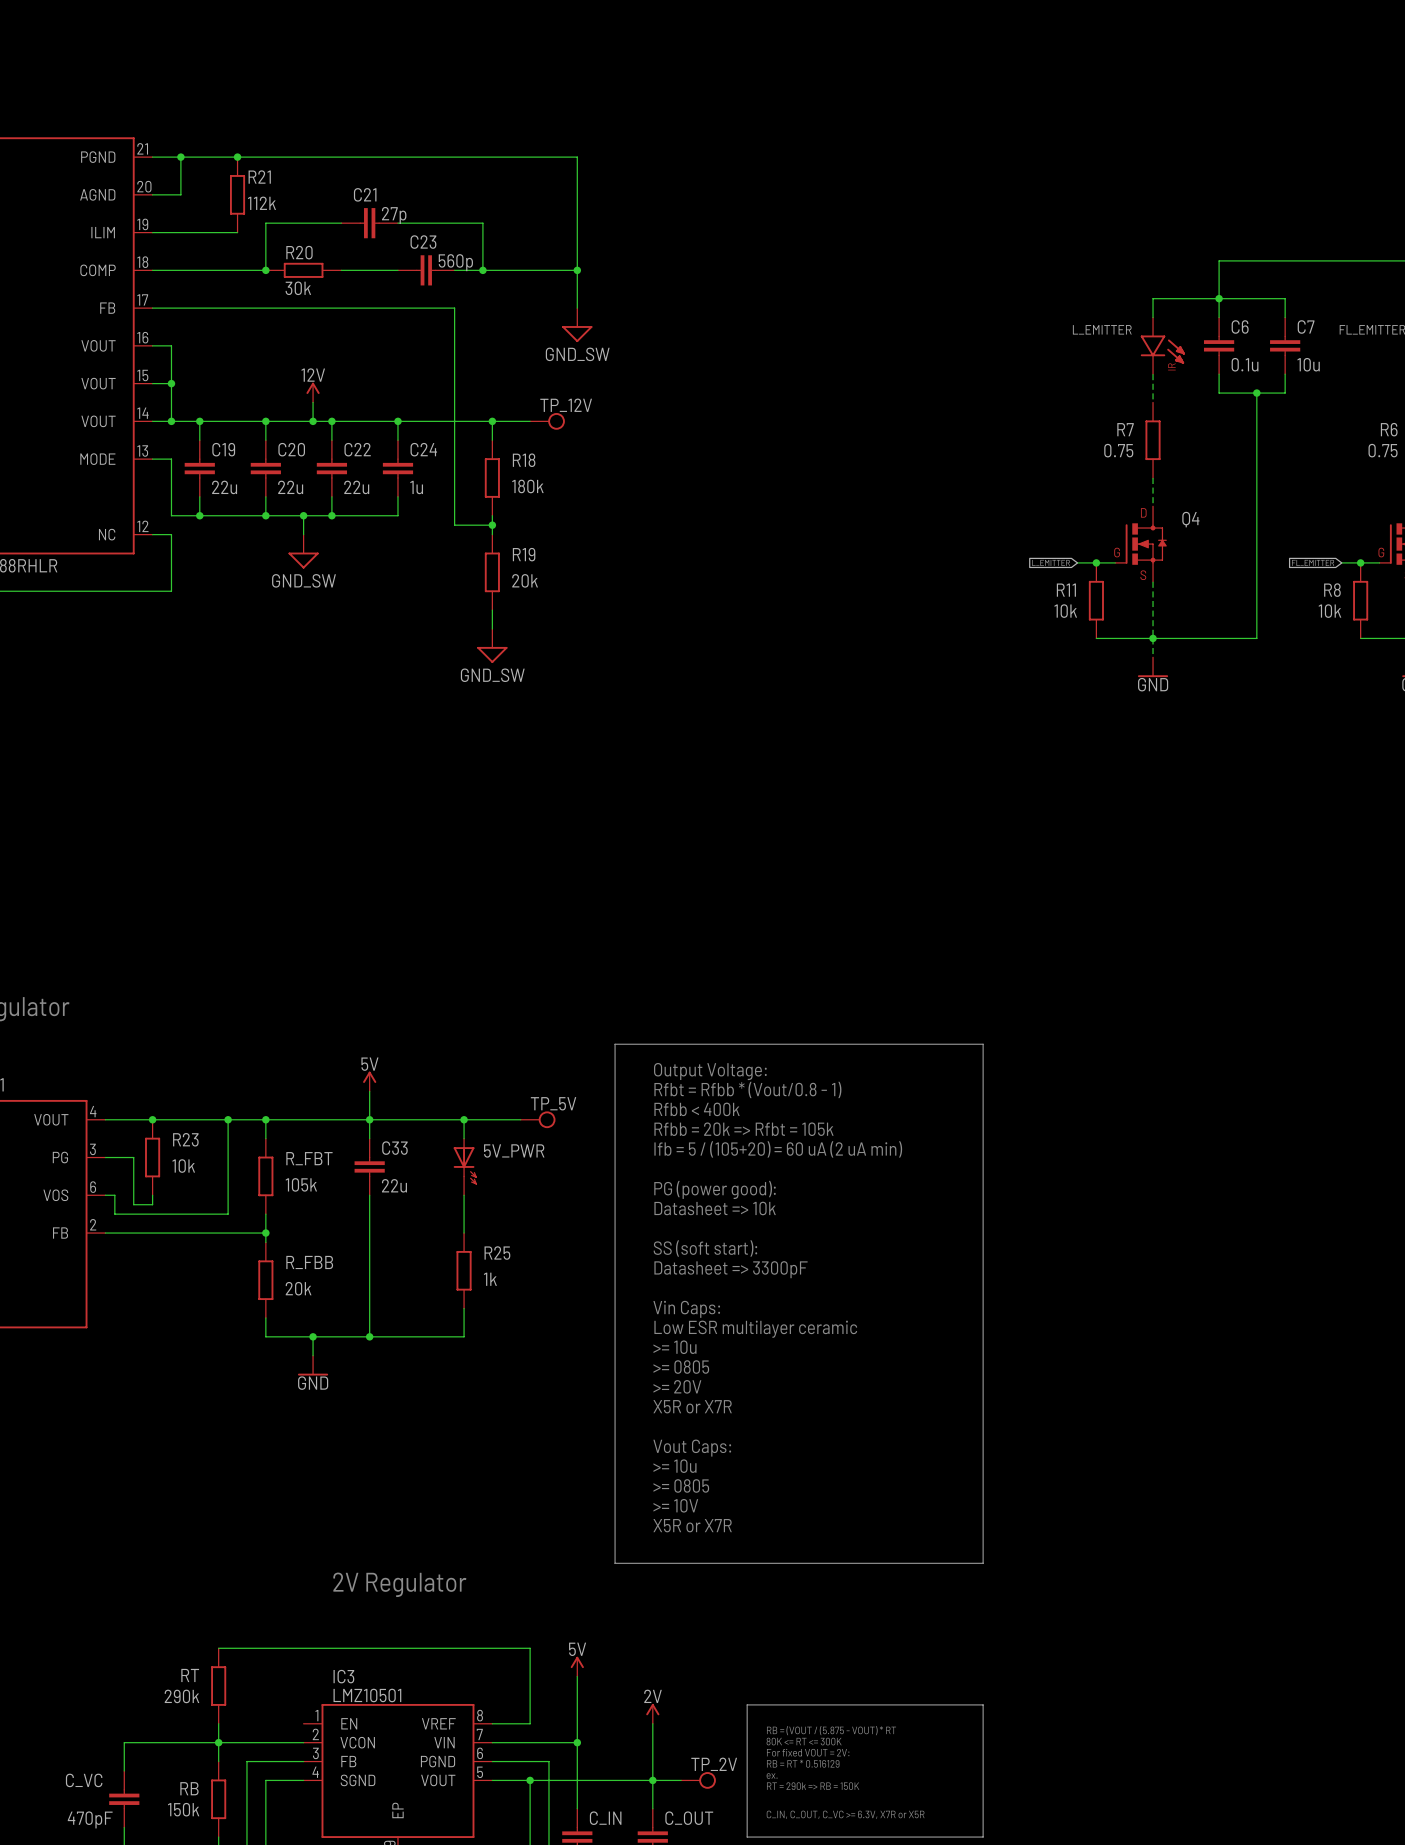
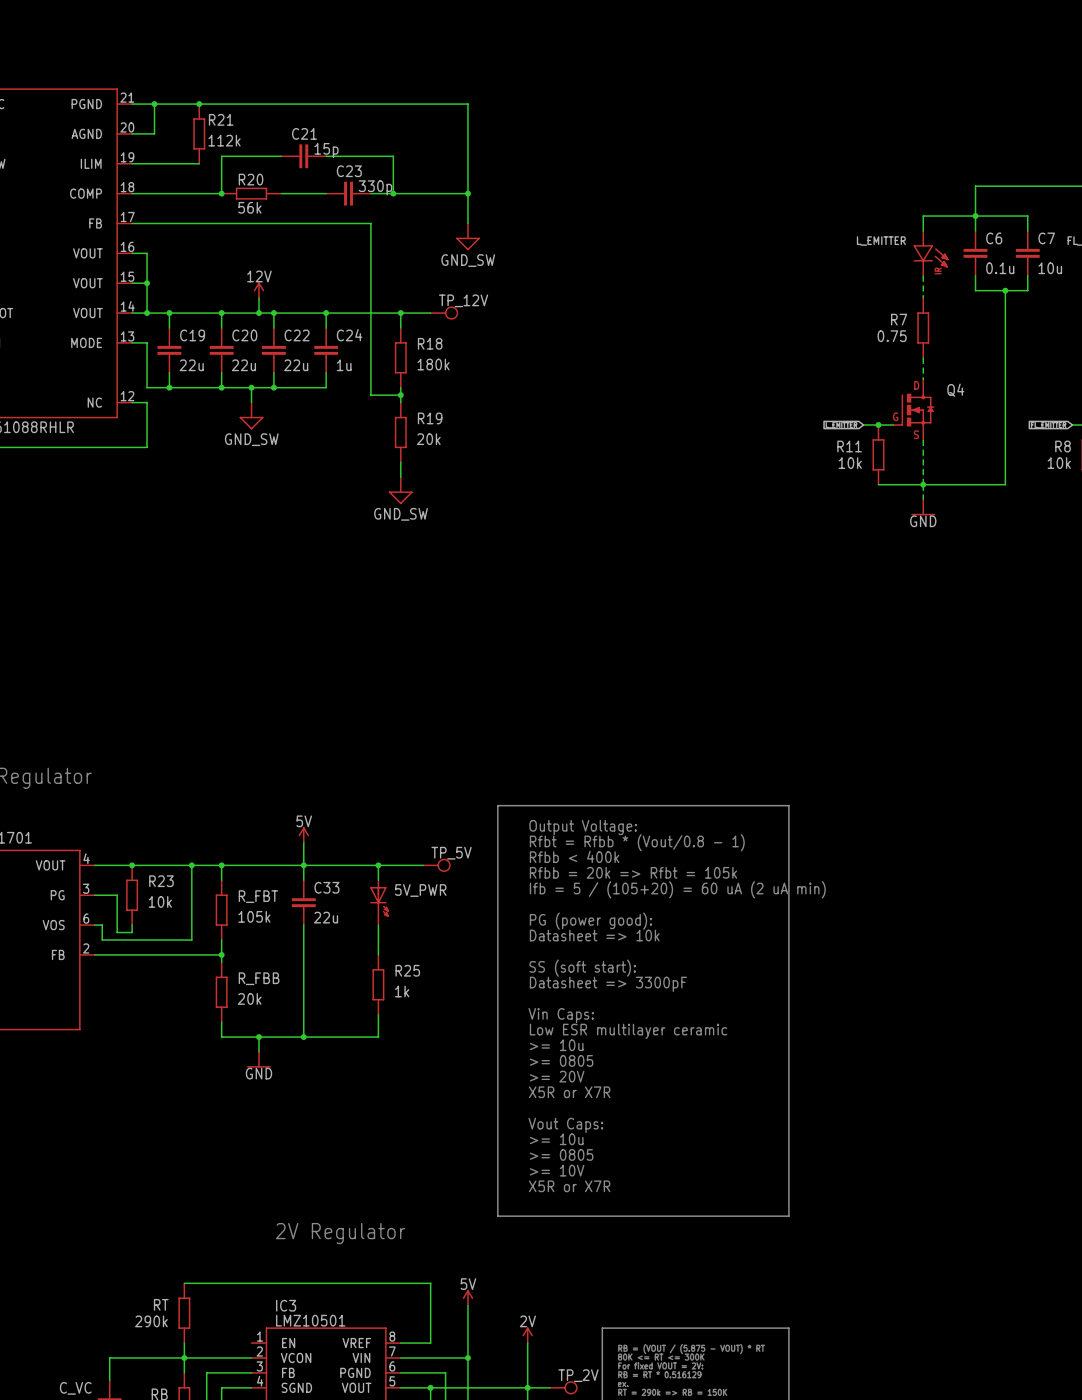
C21 value: 27p (394, 215) -> 15p (326, 150)
C23 value: 560p (455, 262) -> 330p (375, 187)
R20 value: 30k (298, 288) -> 56k (249, 207)

